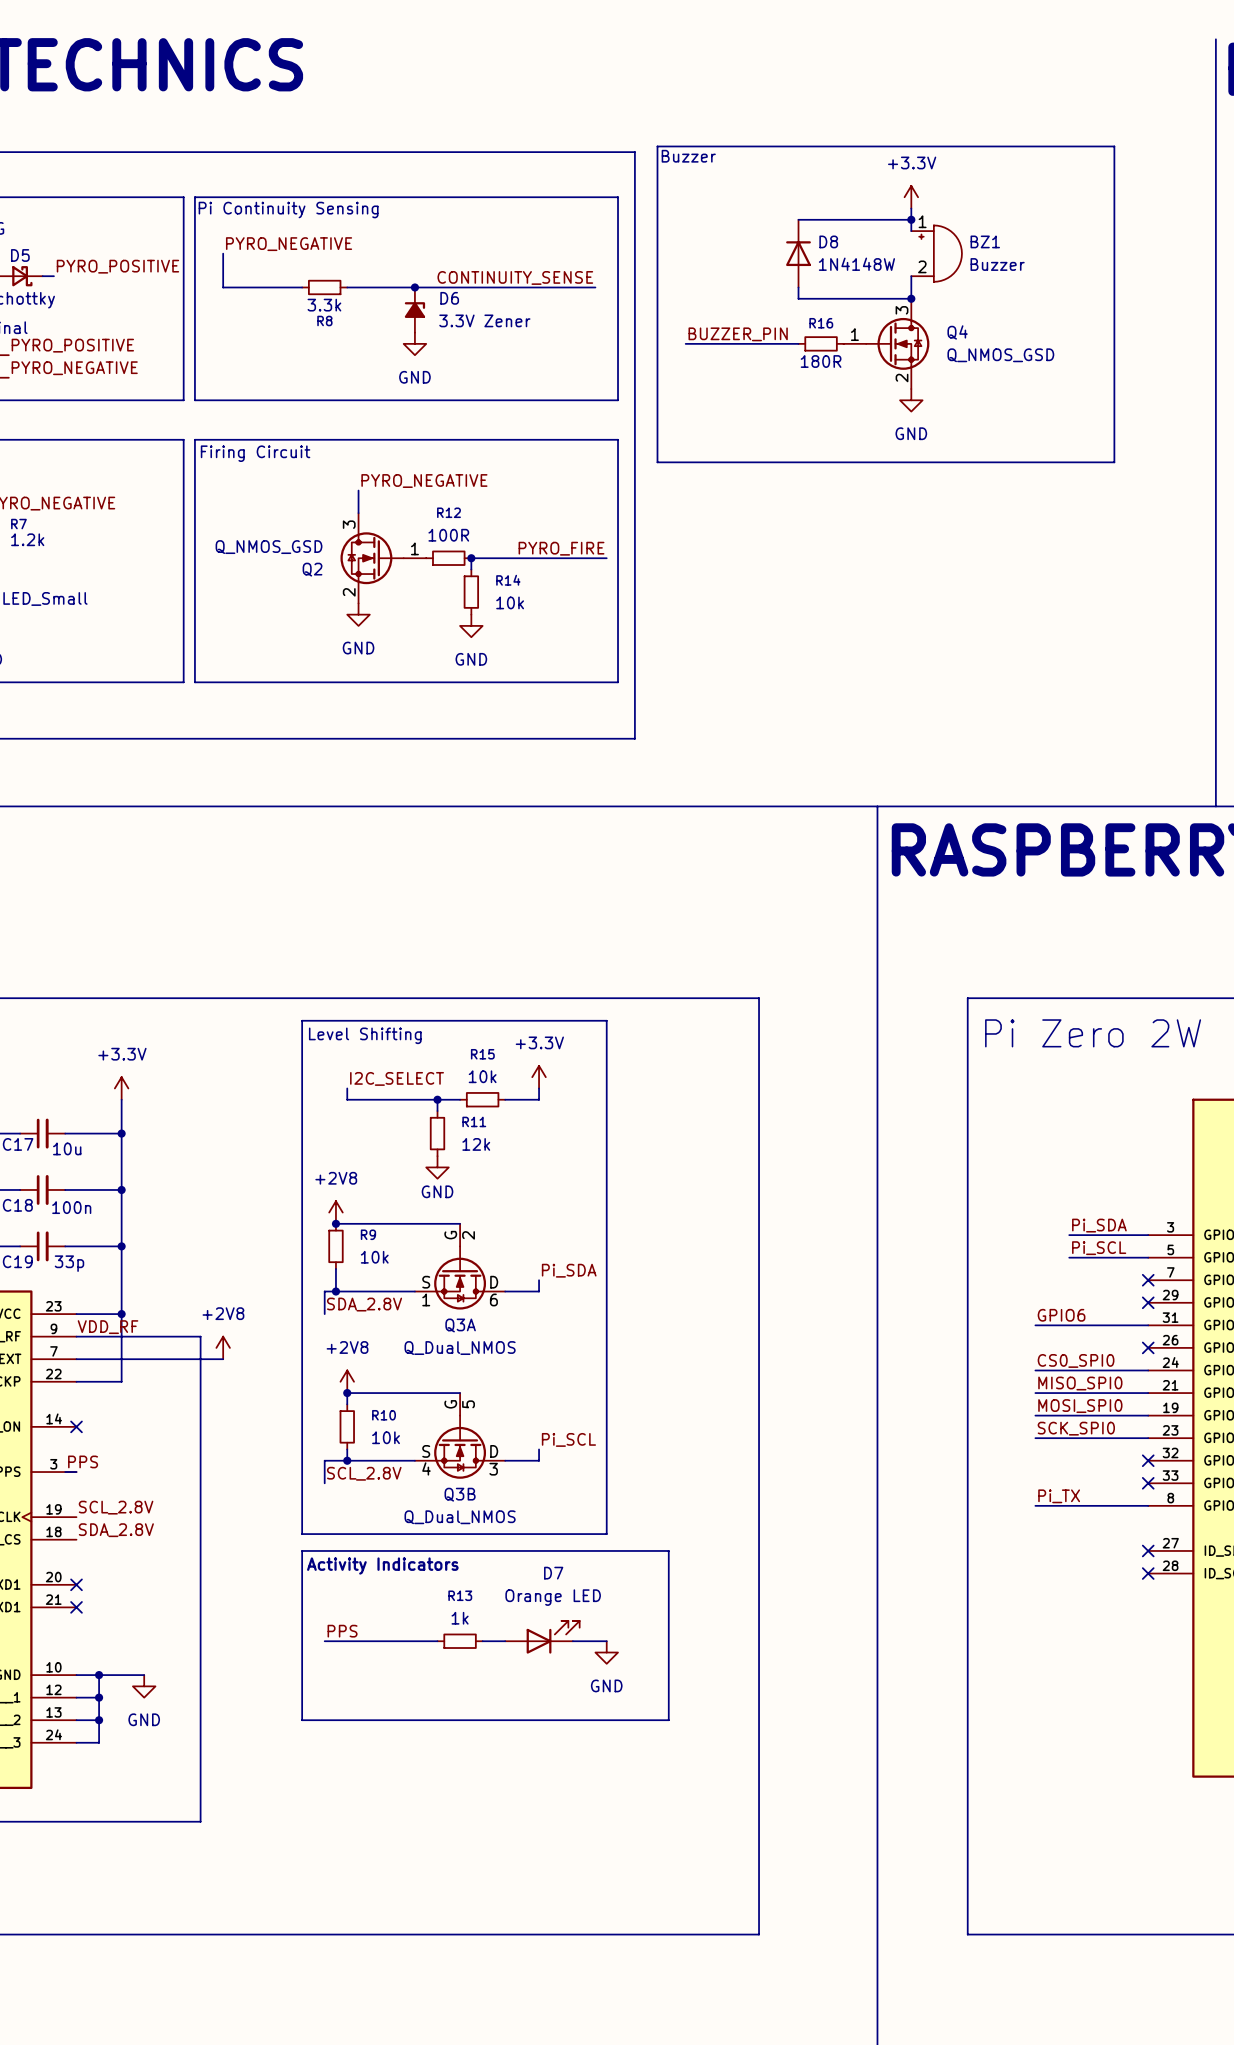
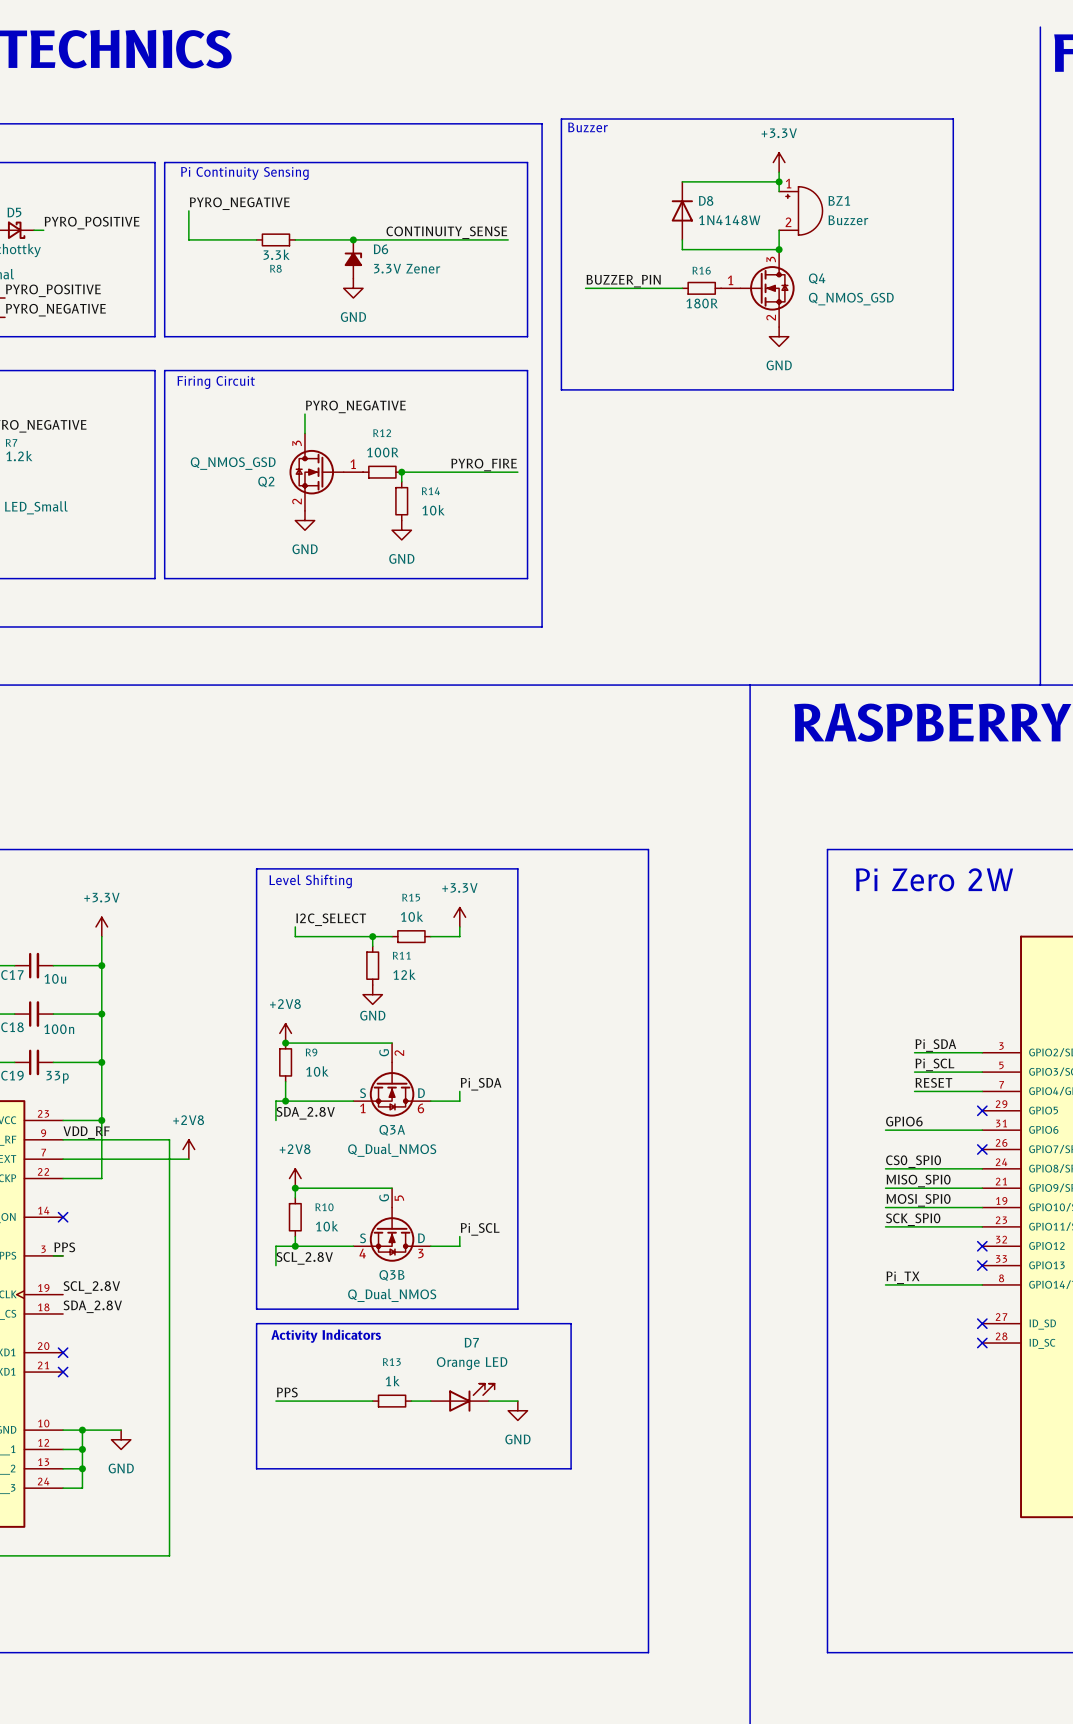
label: none -> RESET (933, 1082)
wire: none -> (914, 1091) (982, 1091)
no-connect mark: (1148, 1280) -> none

